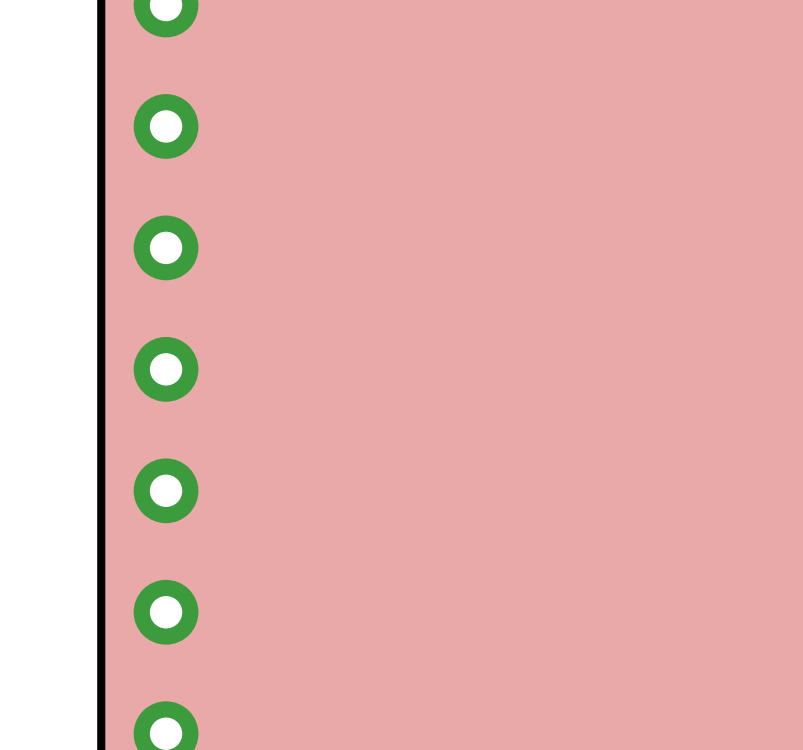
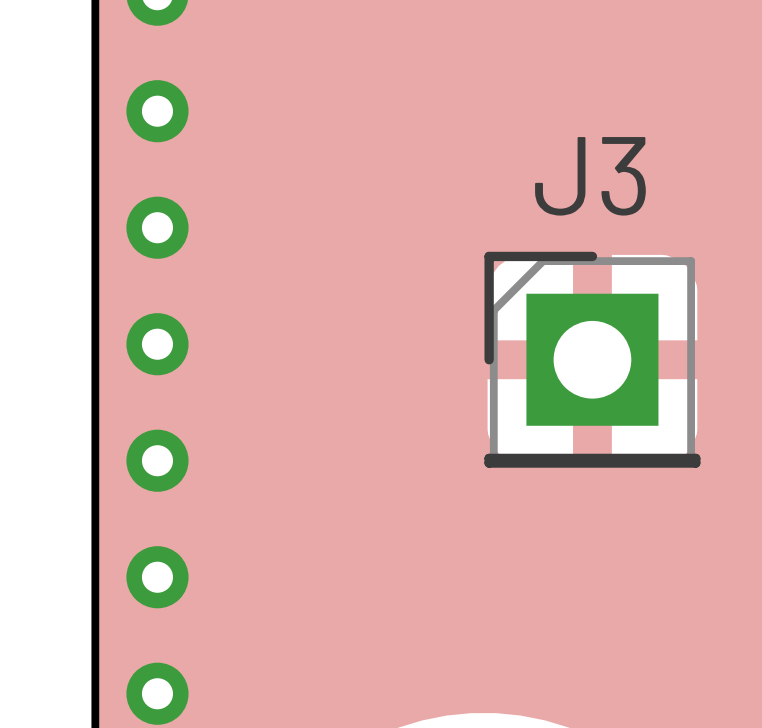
J3: none -> (592, 359)

